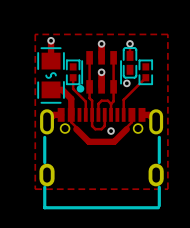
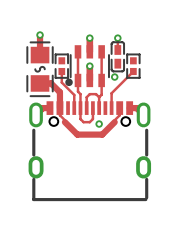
zone outline: (35, 34) (167, 34) (167, 189) (35, 189) (35, 34) -> none

